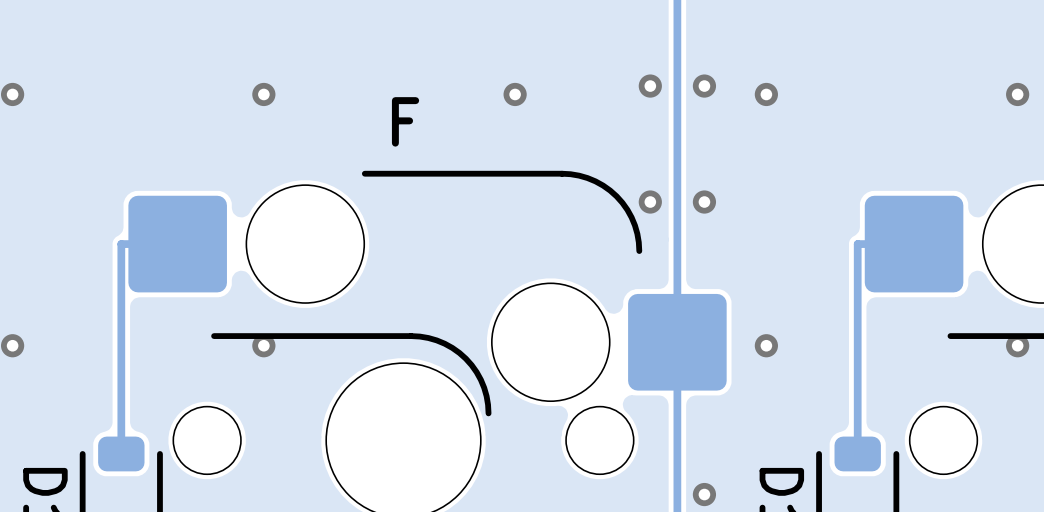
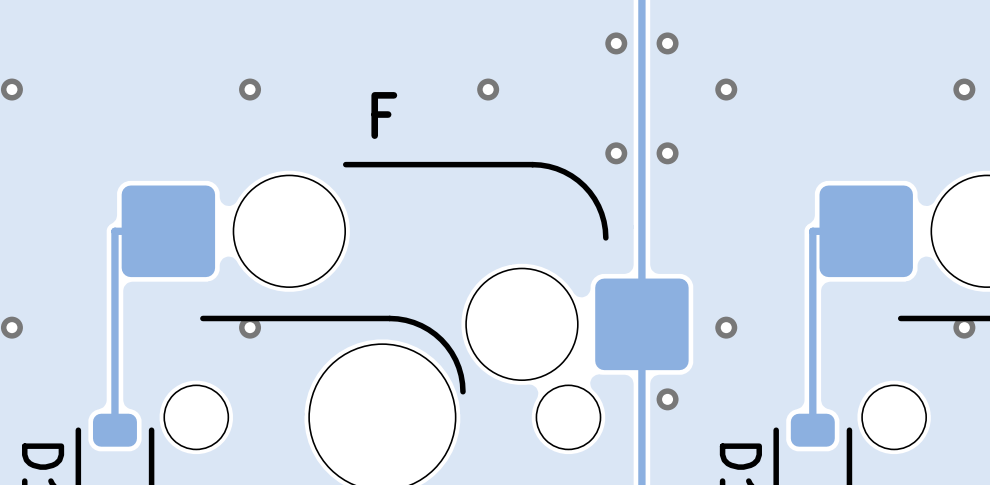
via: none -> (616, 43)
via: none -> (667, 43)
via: (650, 86) -> none
via: (704, 86) -> none
via: none -> (616, 153)
via: none -> (667, 153)
via: (650, 202) -> none
via: (704, 202) -> none
via: none -> (667, 399)
via: (704, 494) -> none

